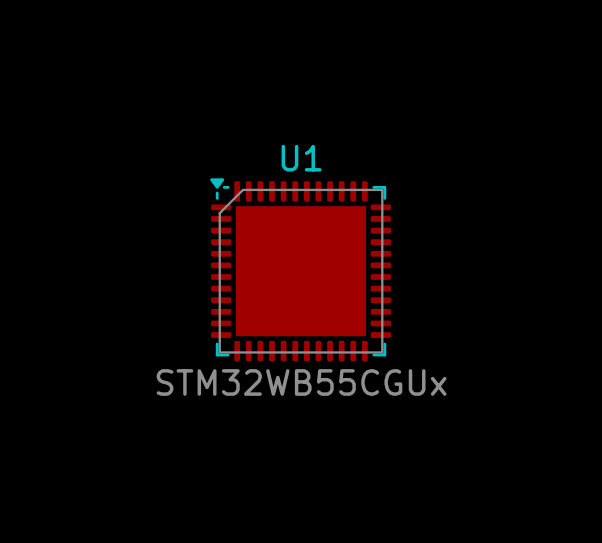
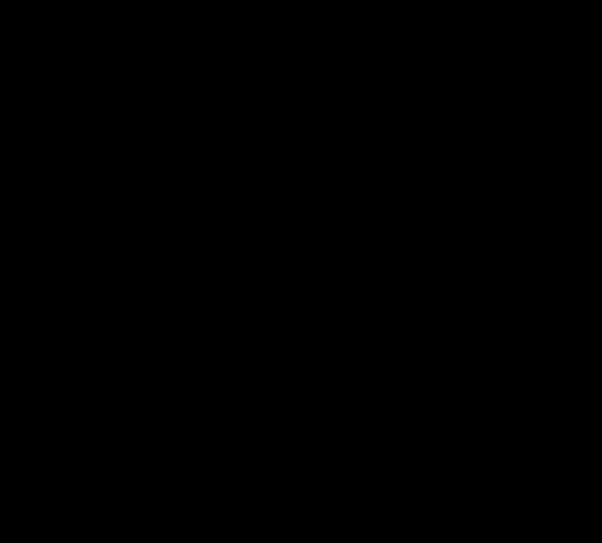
U1: STM32WB55CGUx (300, 269) -> none

